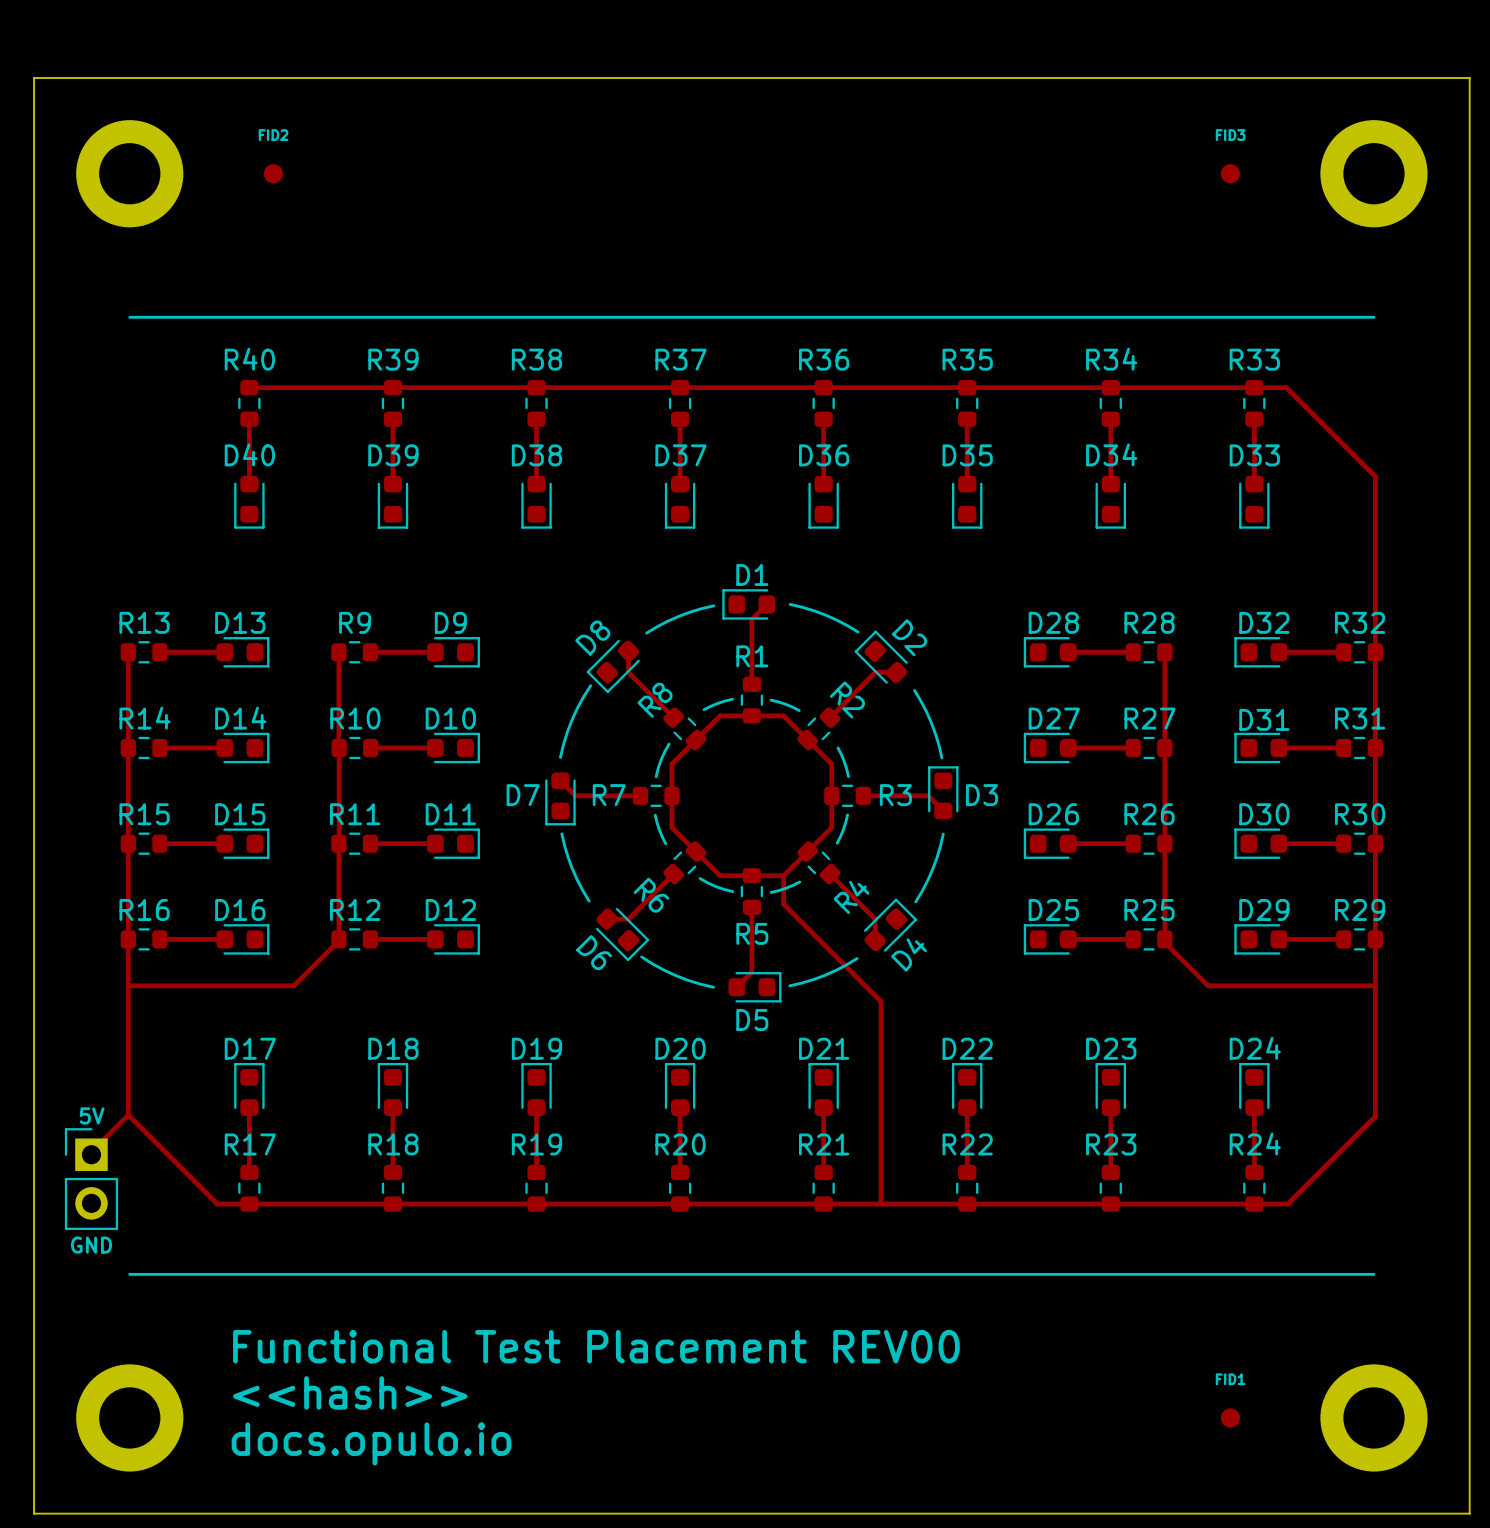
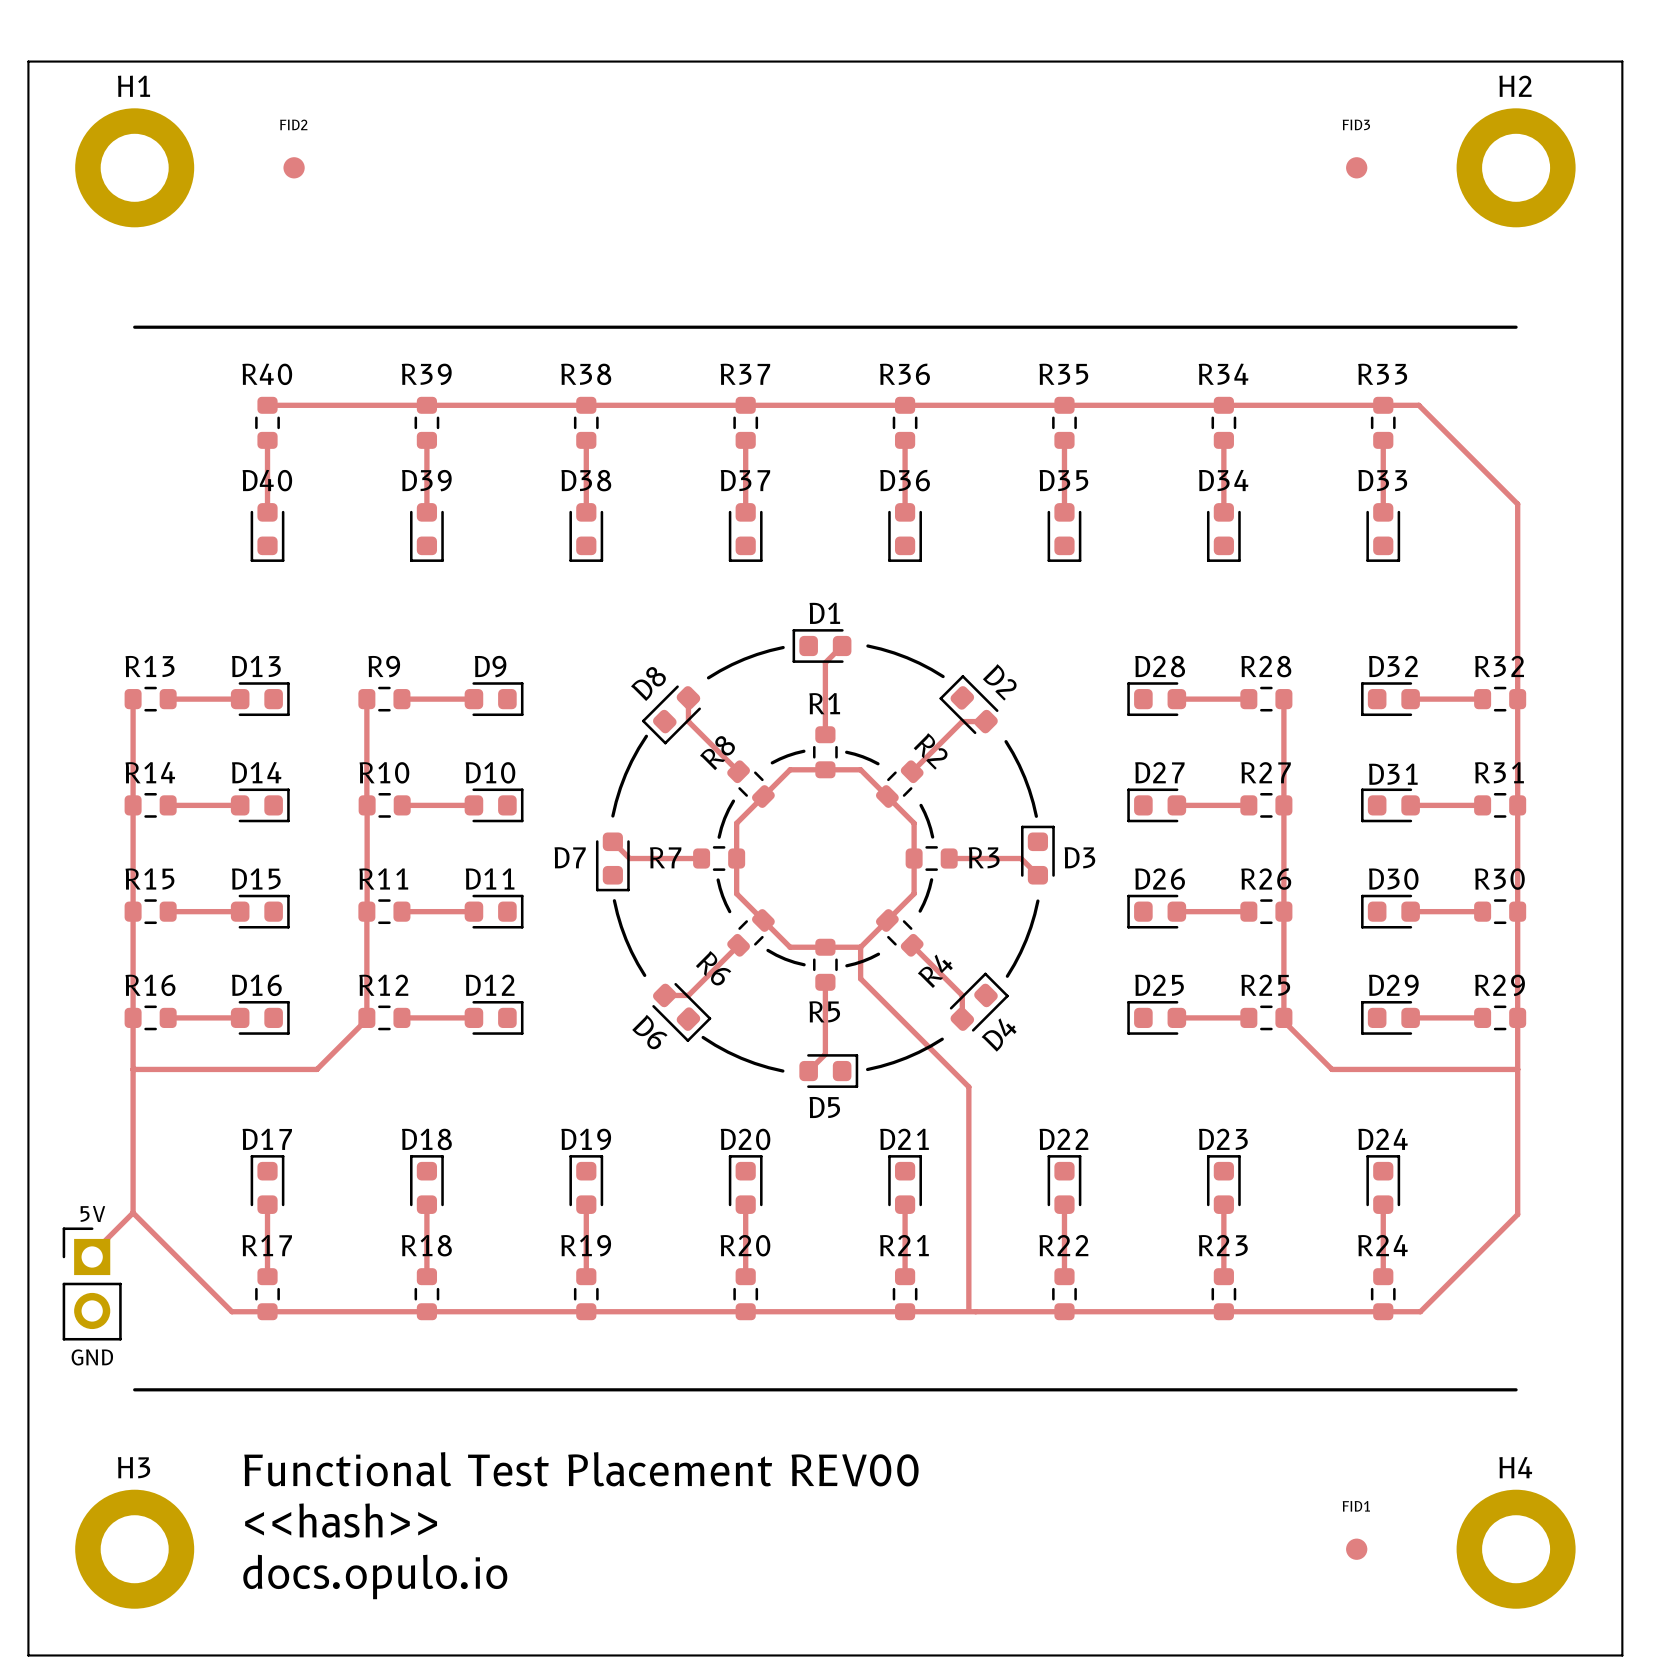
H1 name: none -> H1 (133, 86)
H2 name: none -> H2 (1515, 86)
H3 name: none -> H3 (134, 1467)
H4 name: none -> H4 (1515, 1467)

